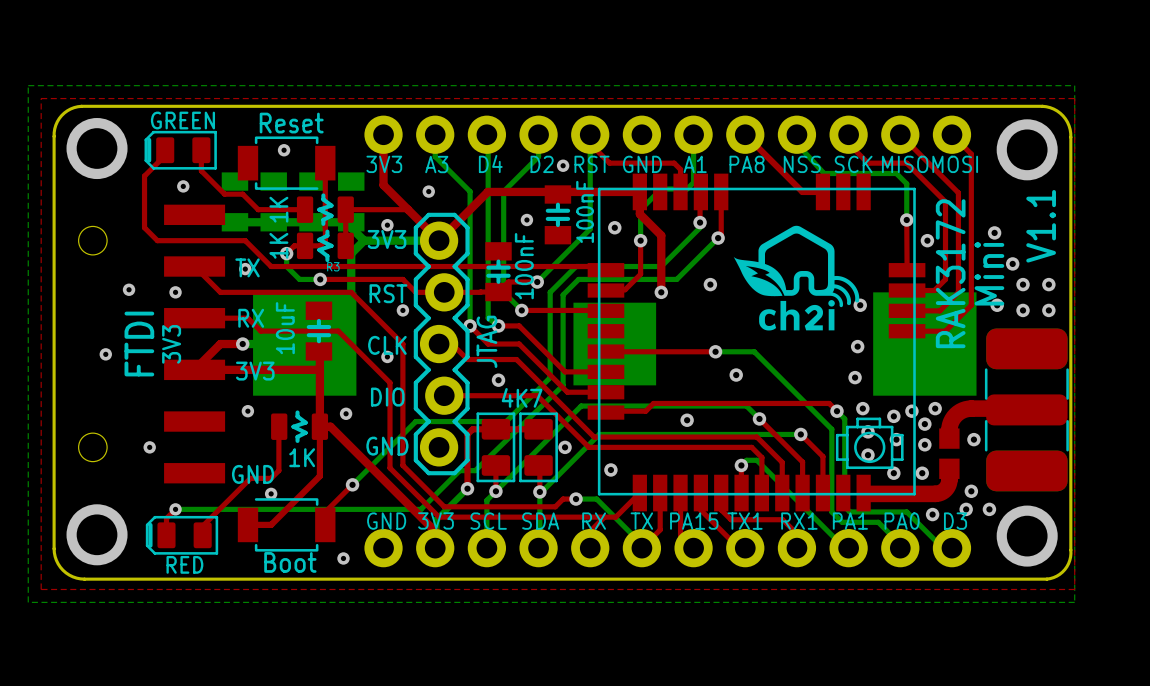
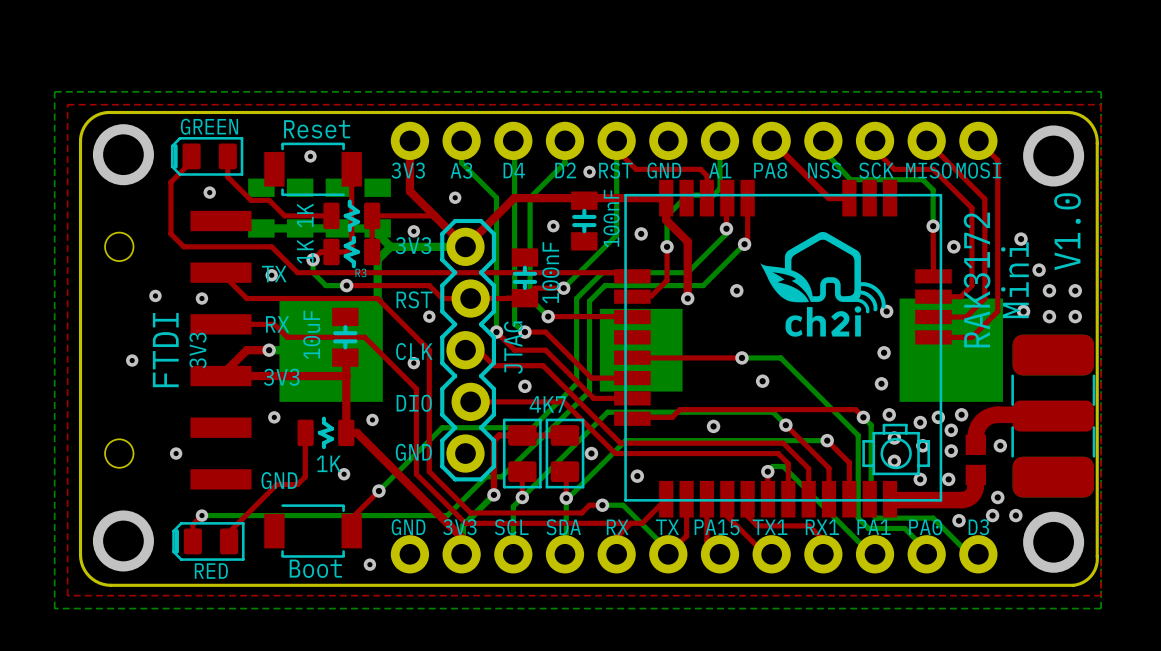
text: V1.1 (1041, 226) -> V1.0 (1067, 231)
top track: (319, 426) (319, 476) (271, 524) (247, 524) -> none
via position: (271, 493) -> (344, 474)

